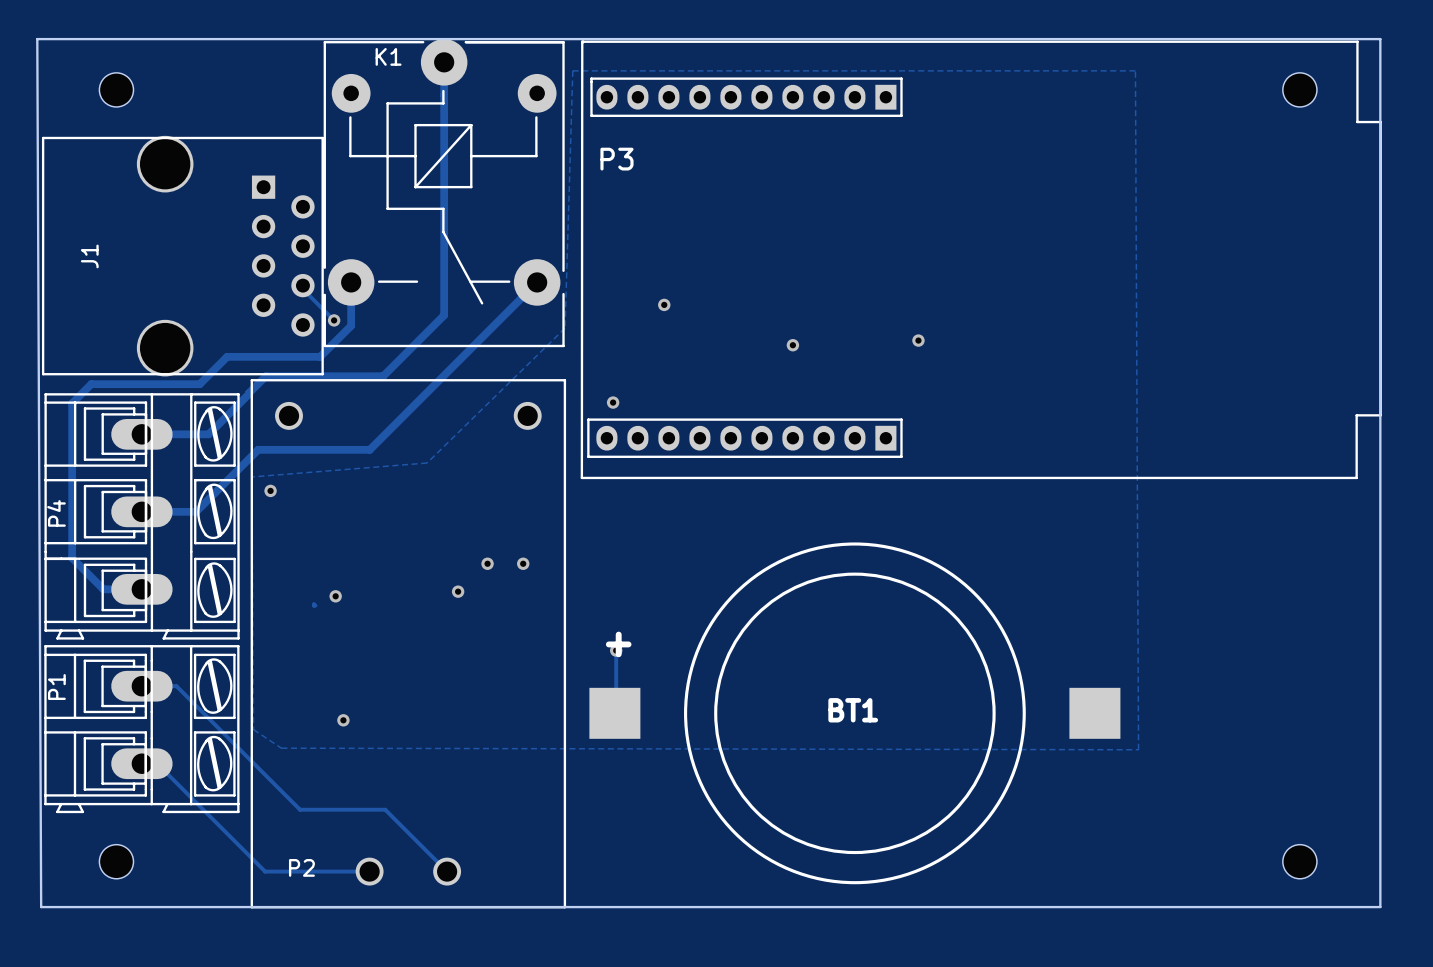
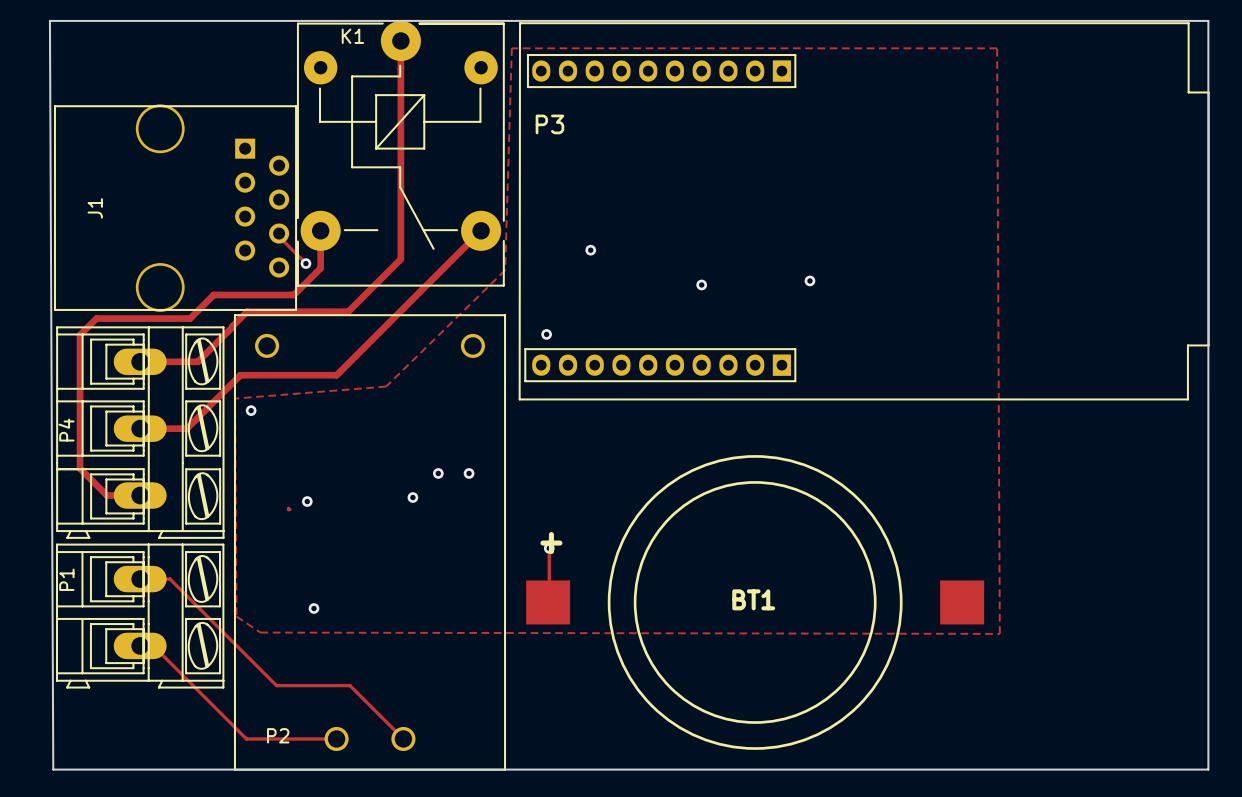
part: (116, 89) -> none
part: (1299, 89) -> none
part: (116, 861) -> none
part: (1299, 861) -> none

